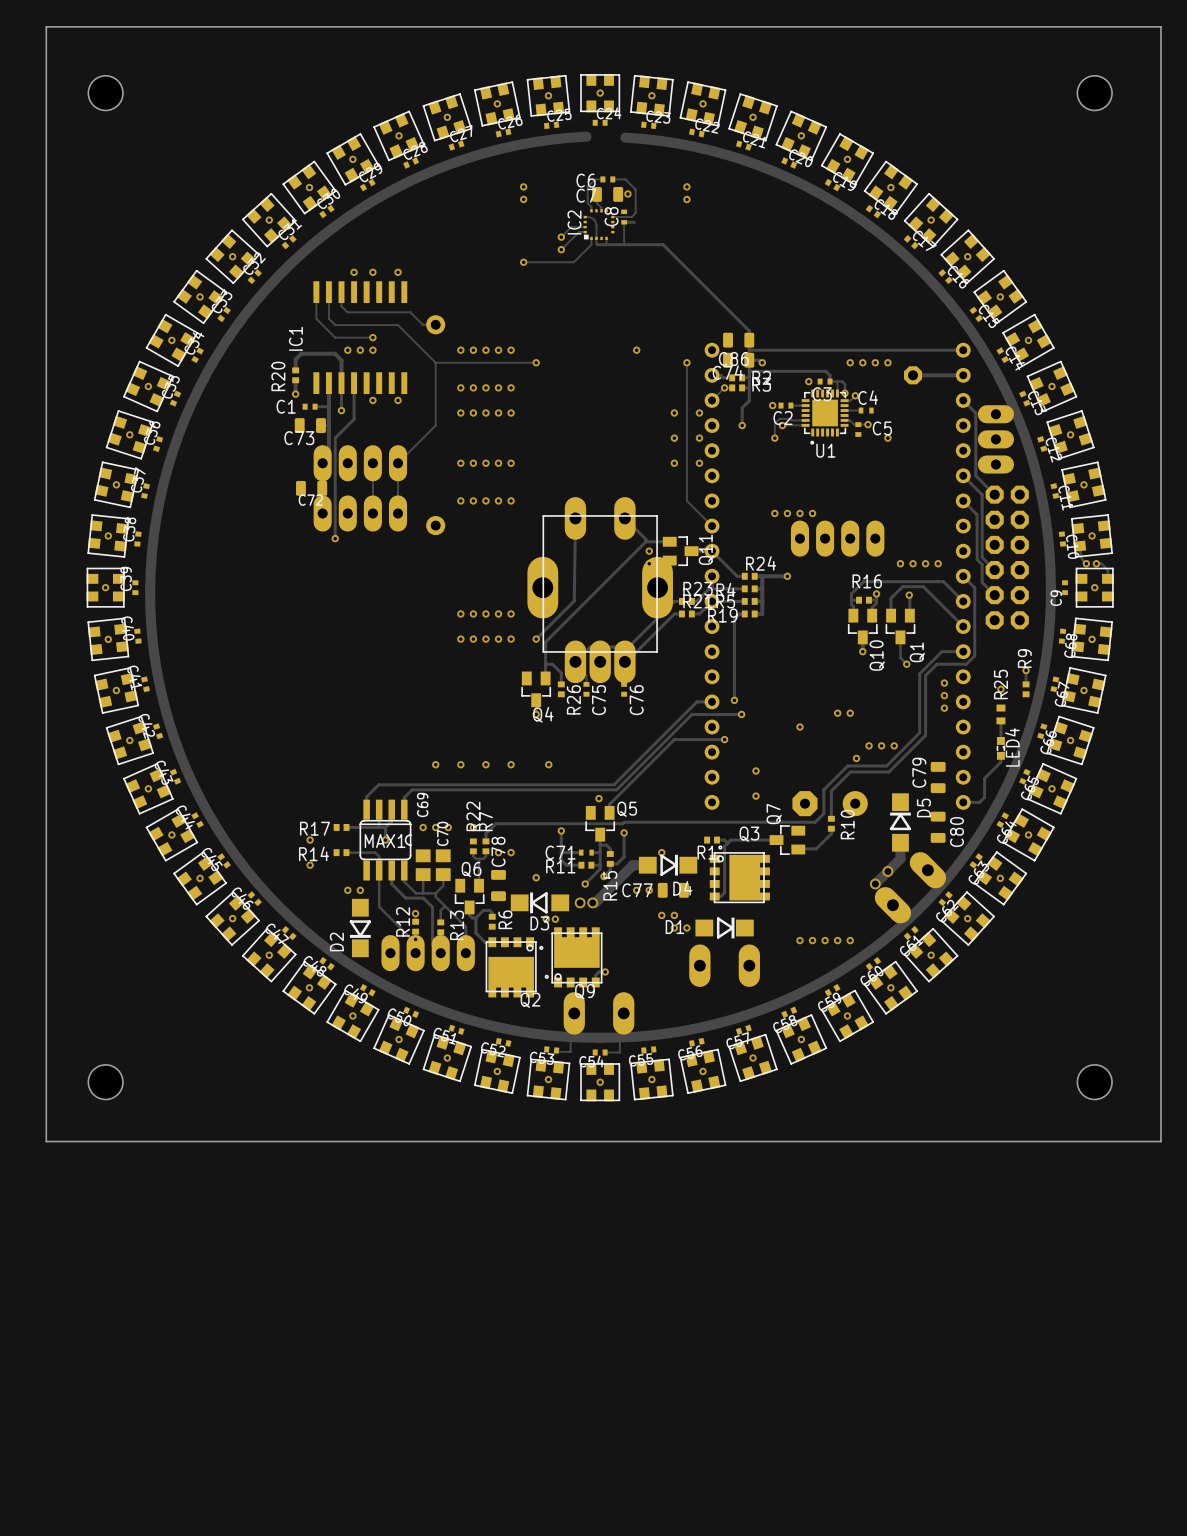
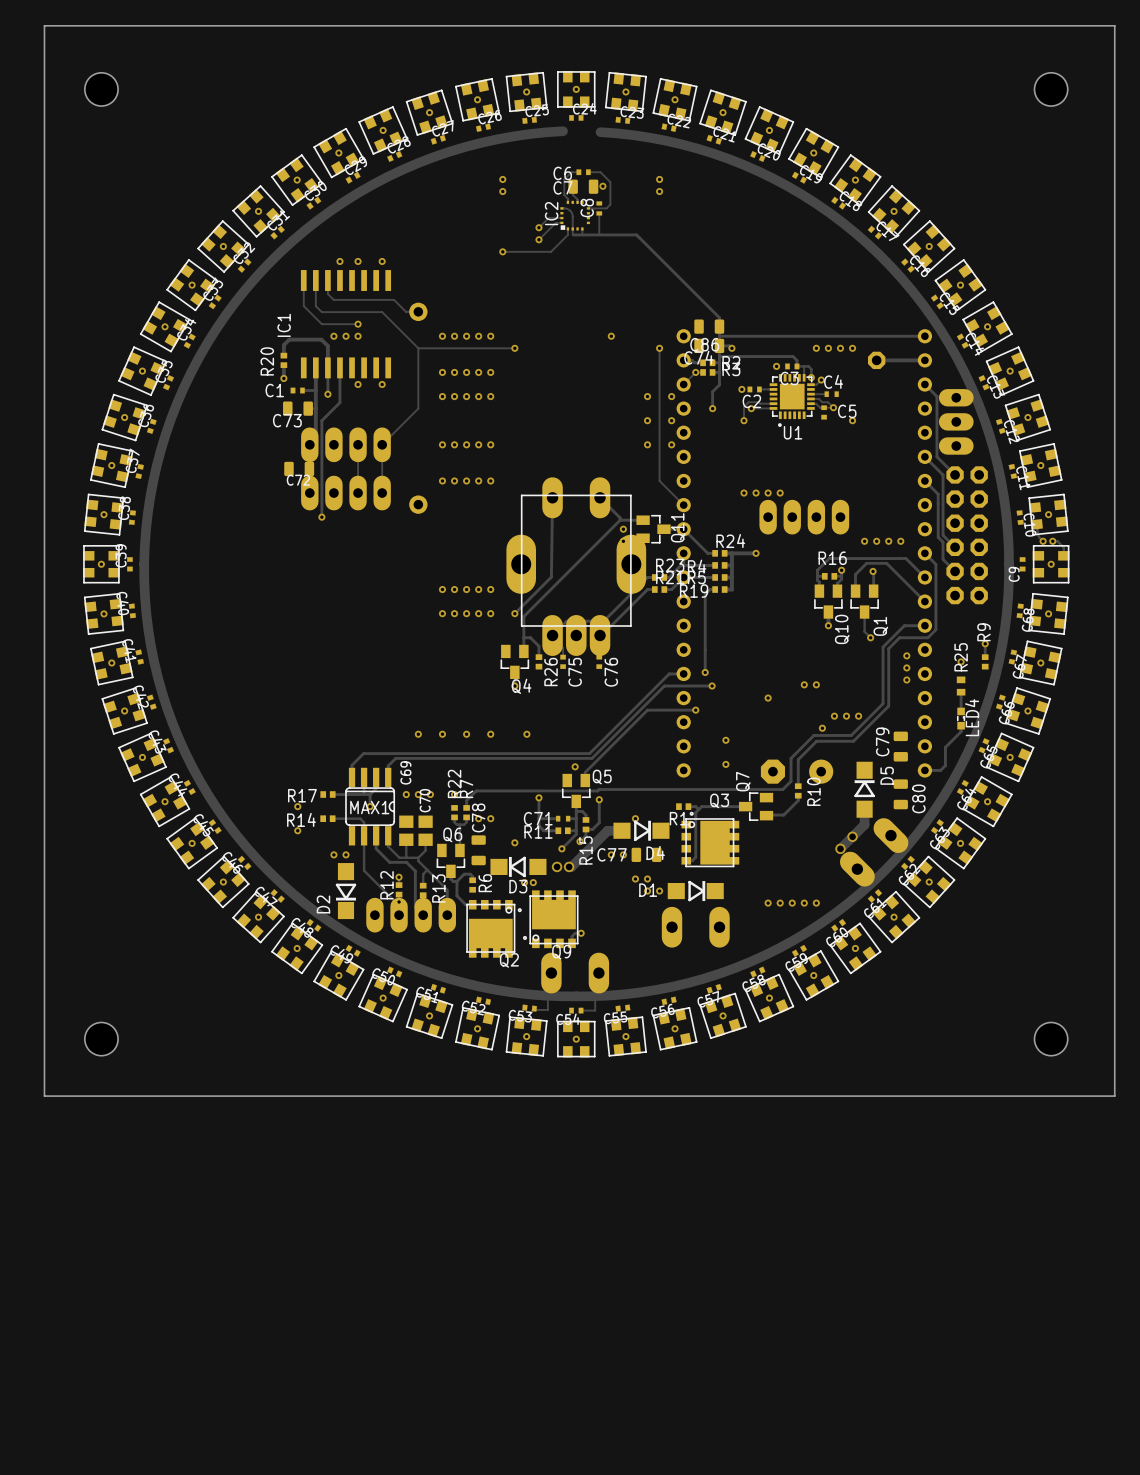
track: (624, 222) (634, 222) -> none
track: none -> (810, 398) (818, 398) (822, 402) (828, 402) (833, 407)

